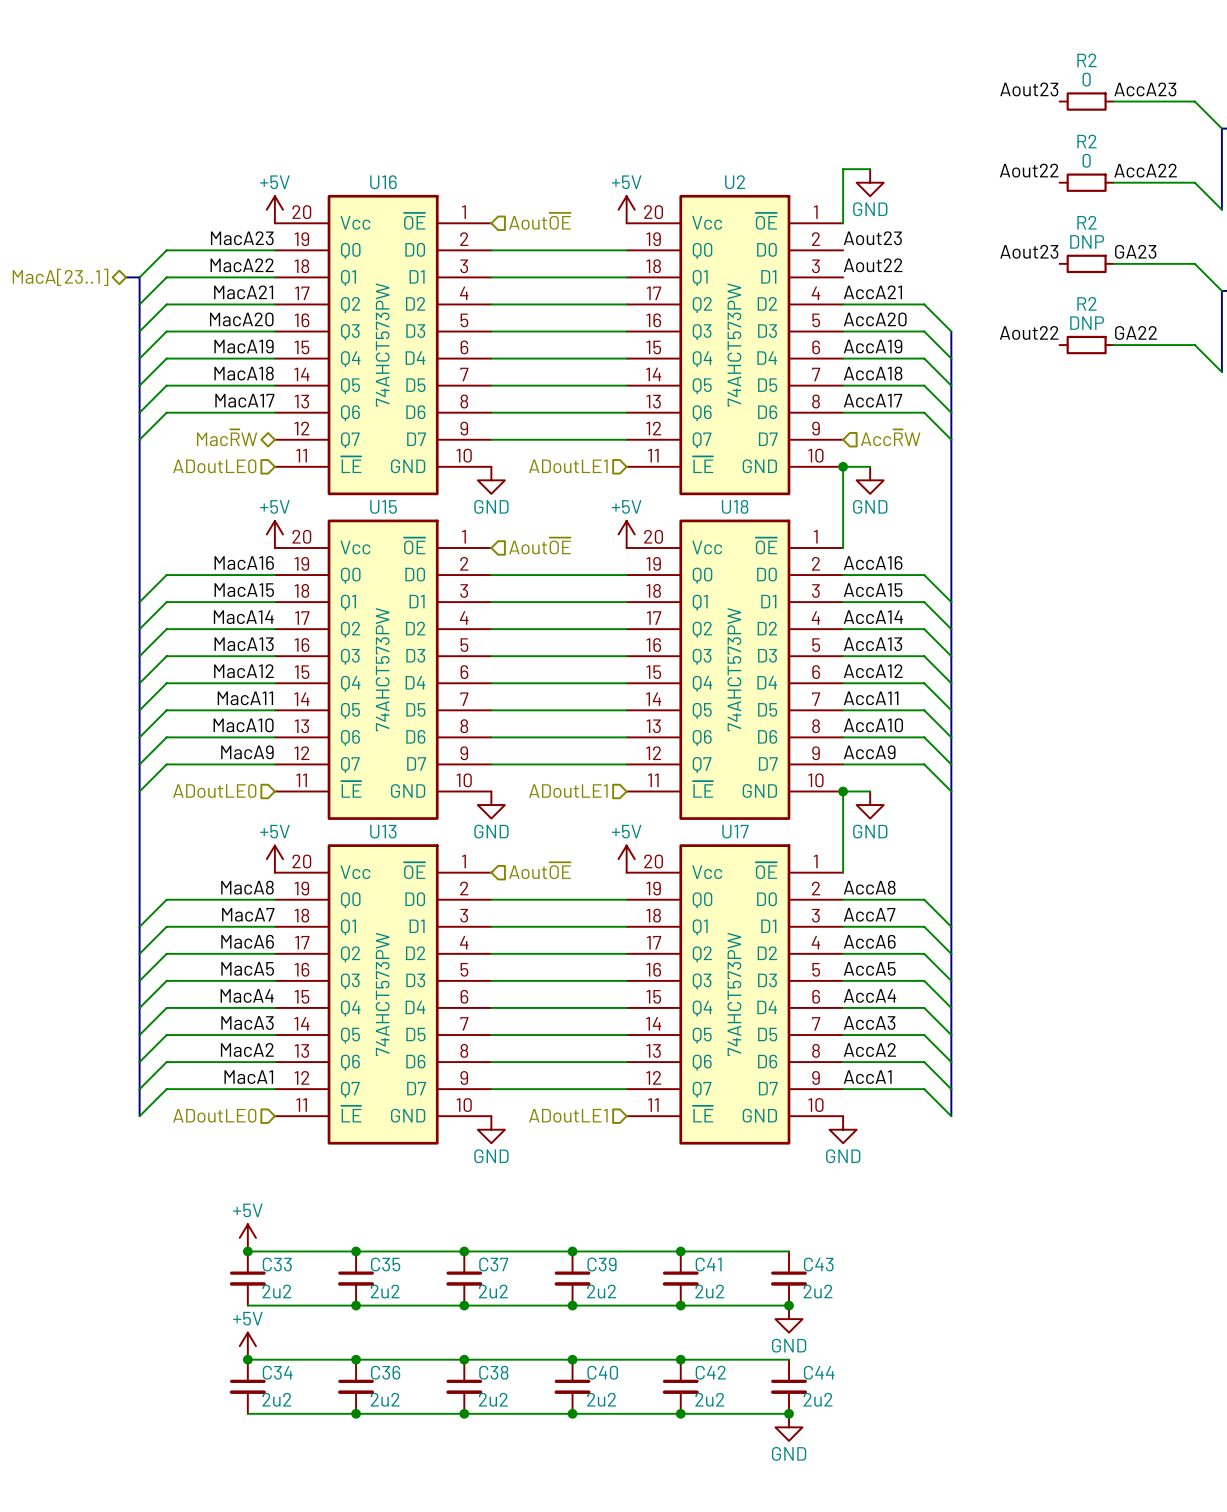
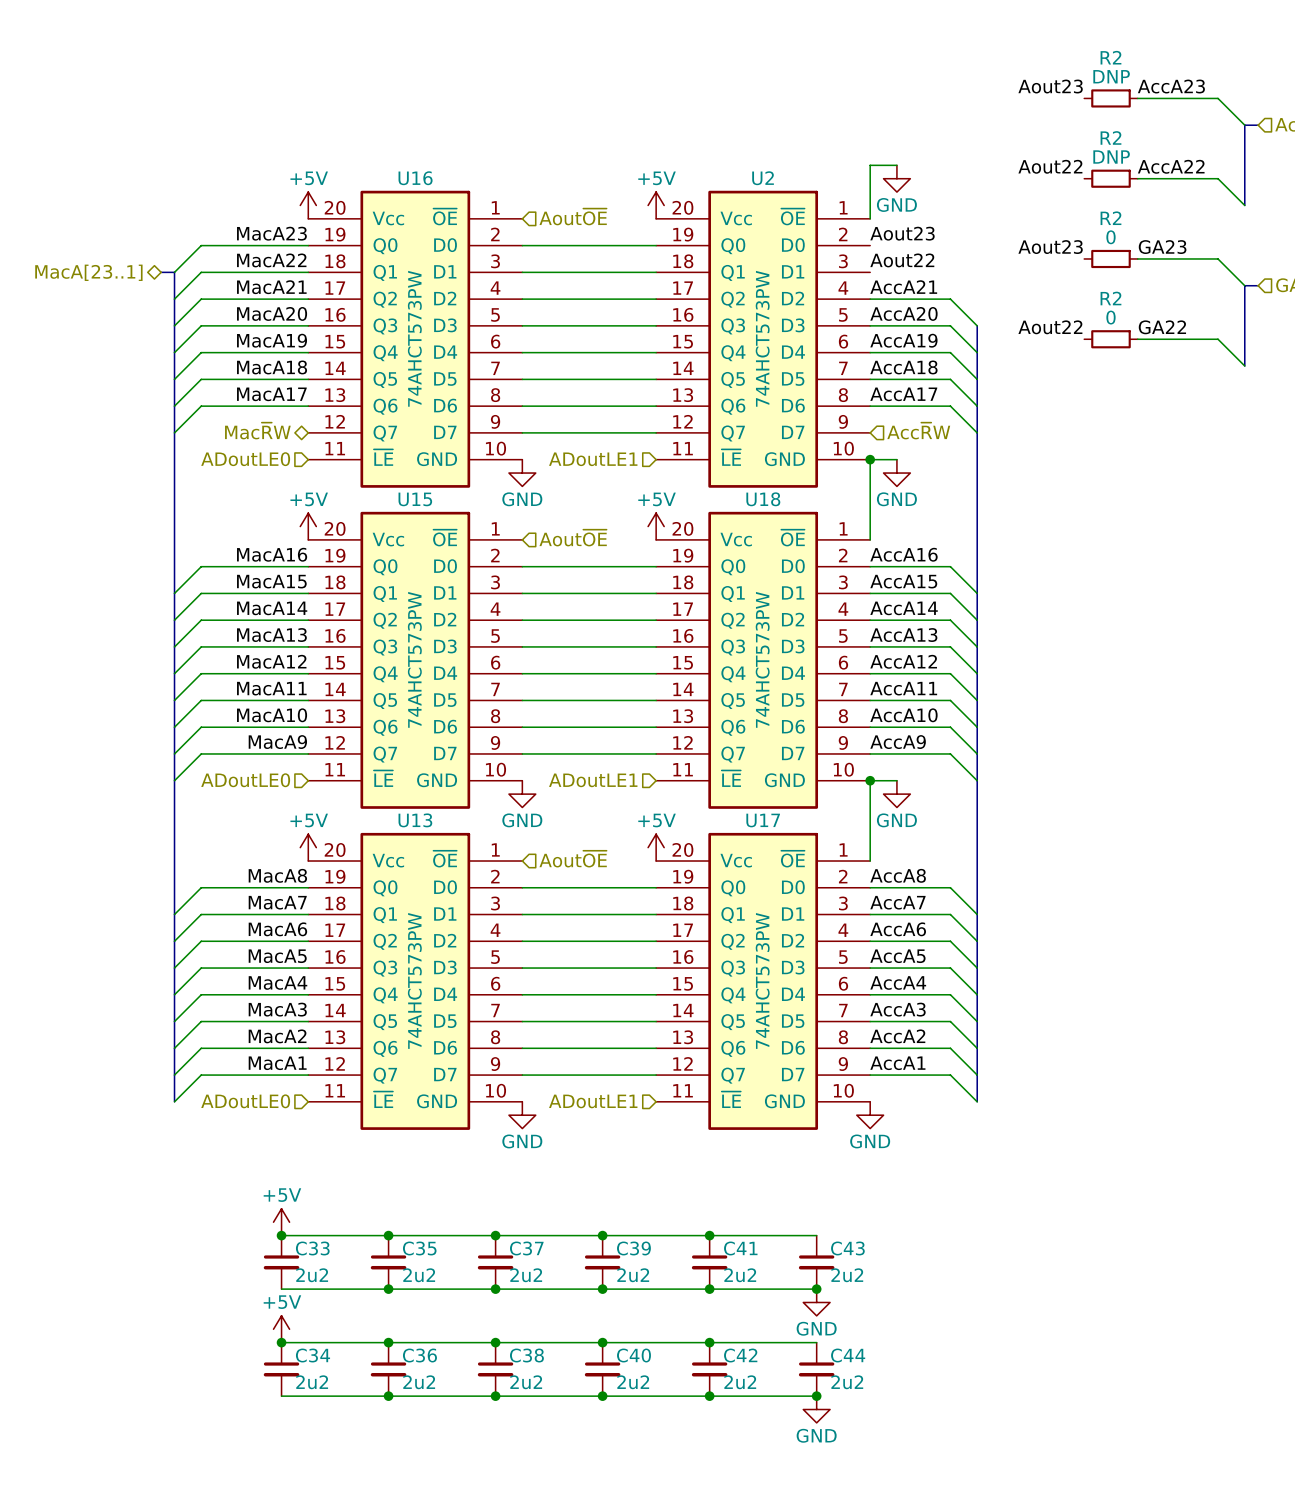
R2 value: 0 (1086, 79) -> DNP (1111, 76)
R2 value: 0 (1086, 160) -> DNP (1111, 157)
R2 value: DNP (1087, 241) -> 0 (1110, 237)
R2 value: DNP (1087, 323) -> 0 (1110, 317)

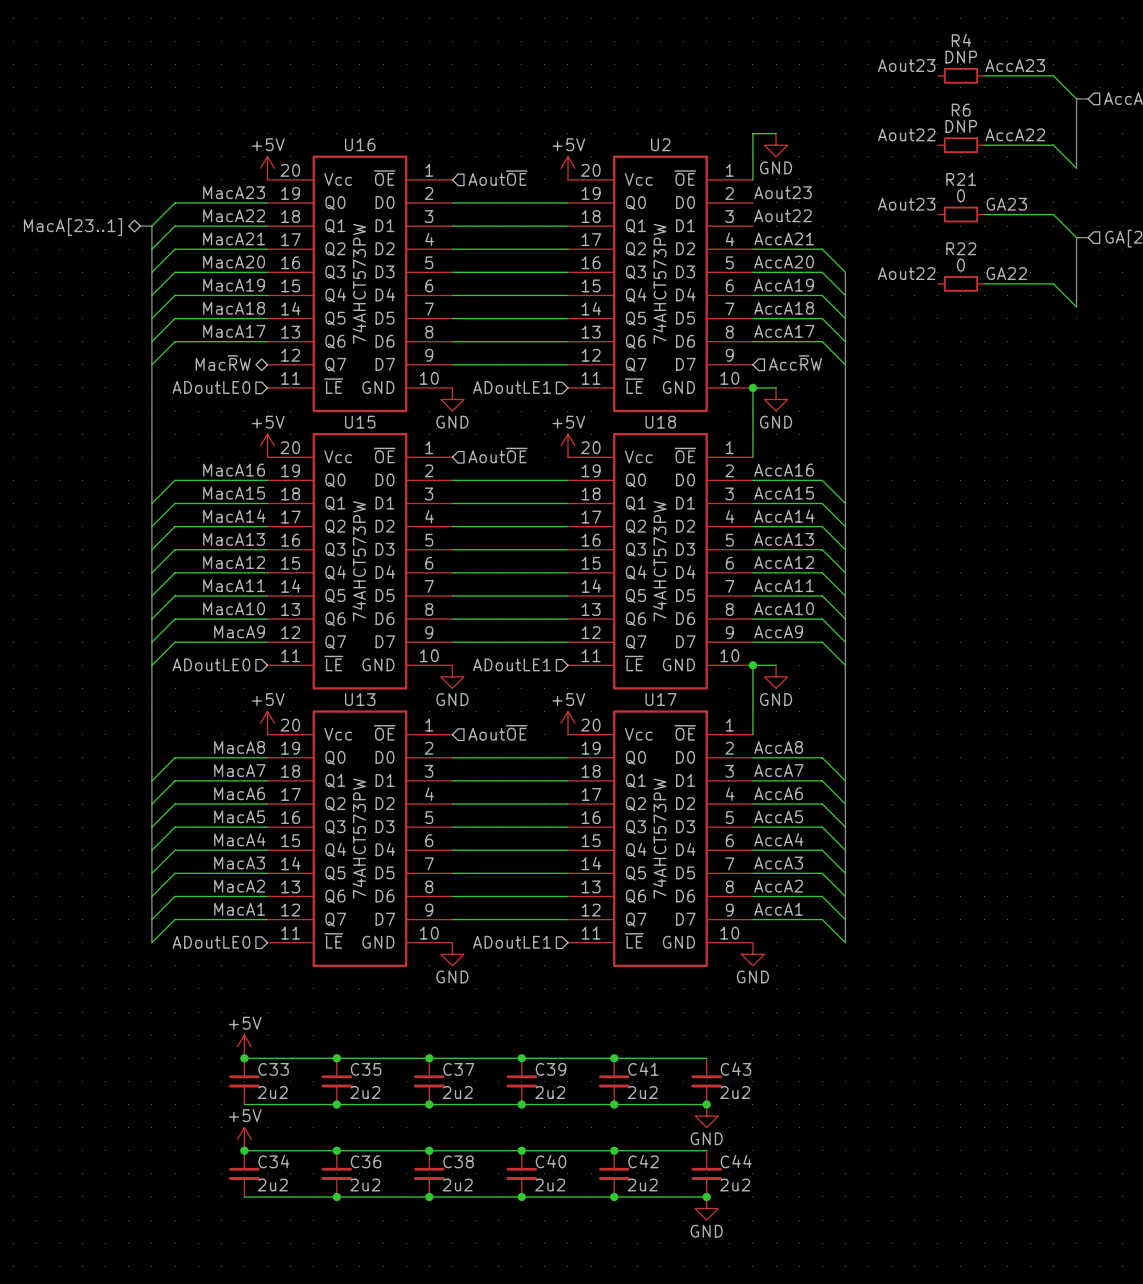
R2 name: R2 (1110, 57) -> R4 (961, 40)
R2 name: R2 (1110, 137) -> R6 (961, 110)
R2 name: R2 (1110, 218) -> R21 (961, 179)
R2 name: R2 (1110, 298) -> R22 (961, 248)

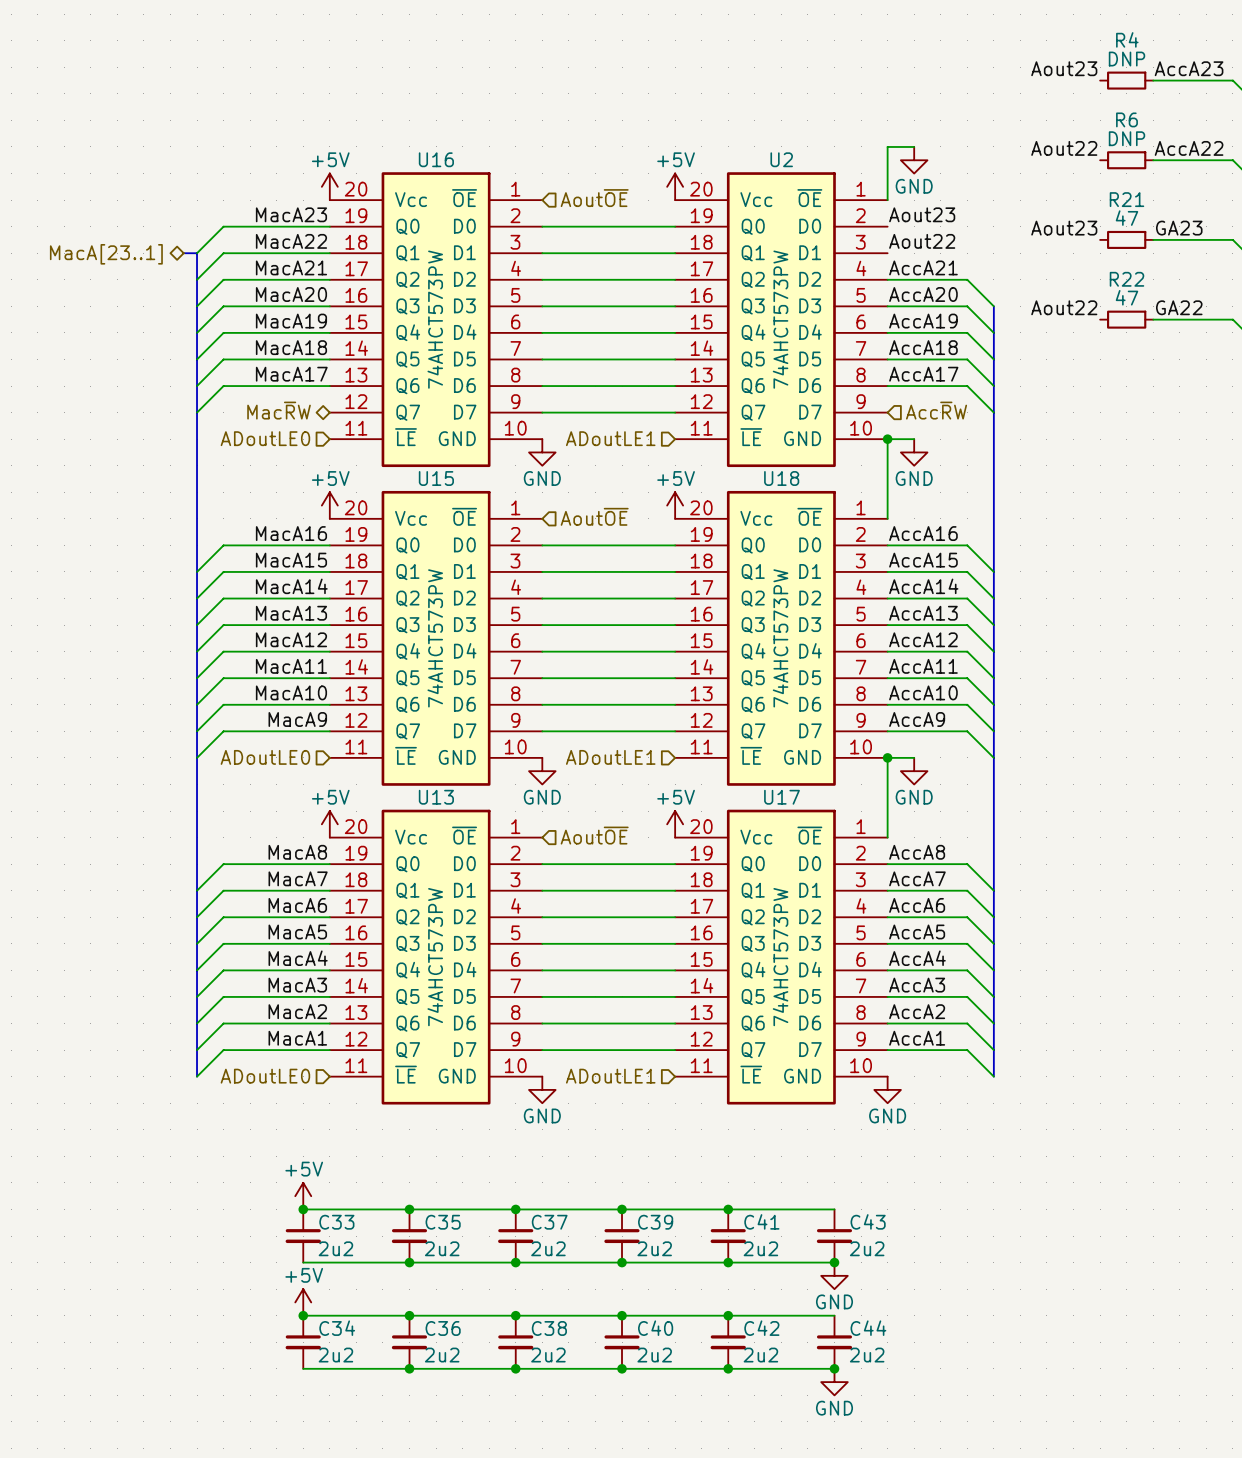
R21 value: 0 (960, 195) -> 47 (1126, 218)
R22 value: 0 (960, 265) -> 47 (1126, 297)

